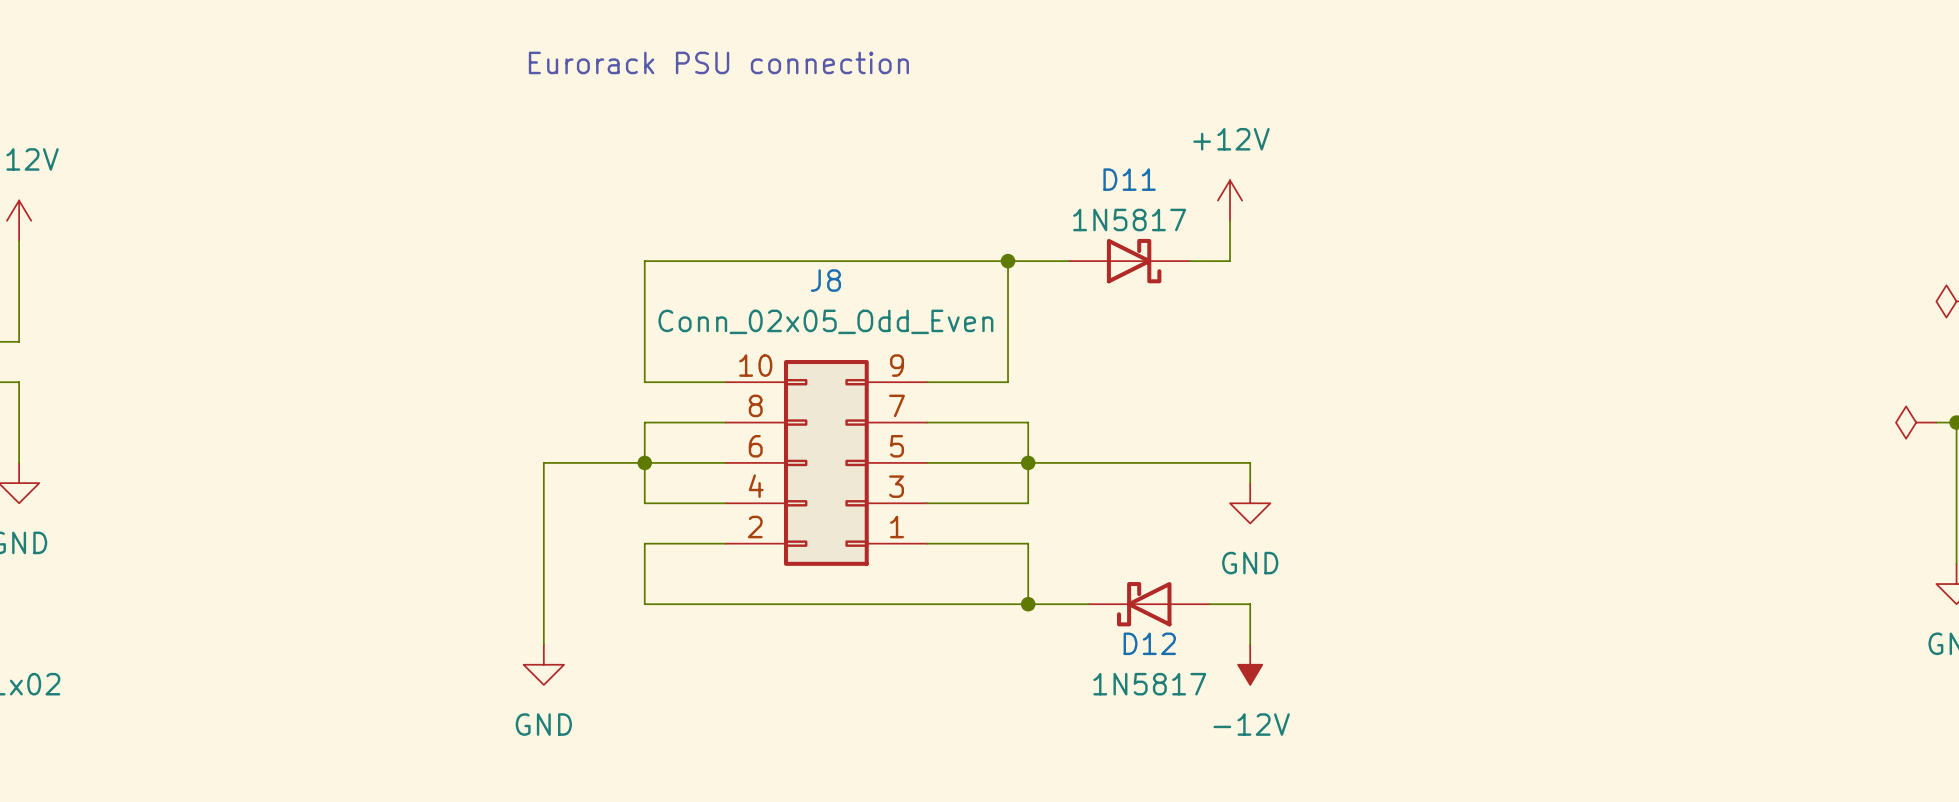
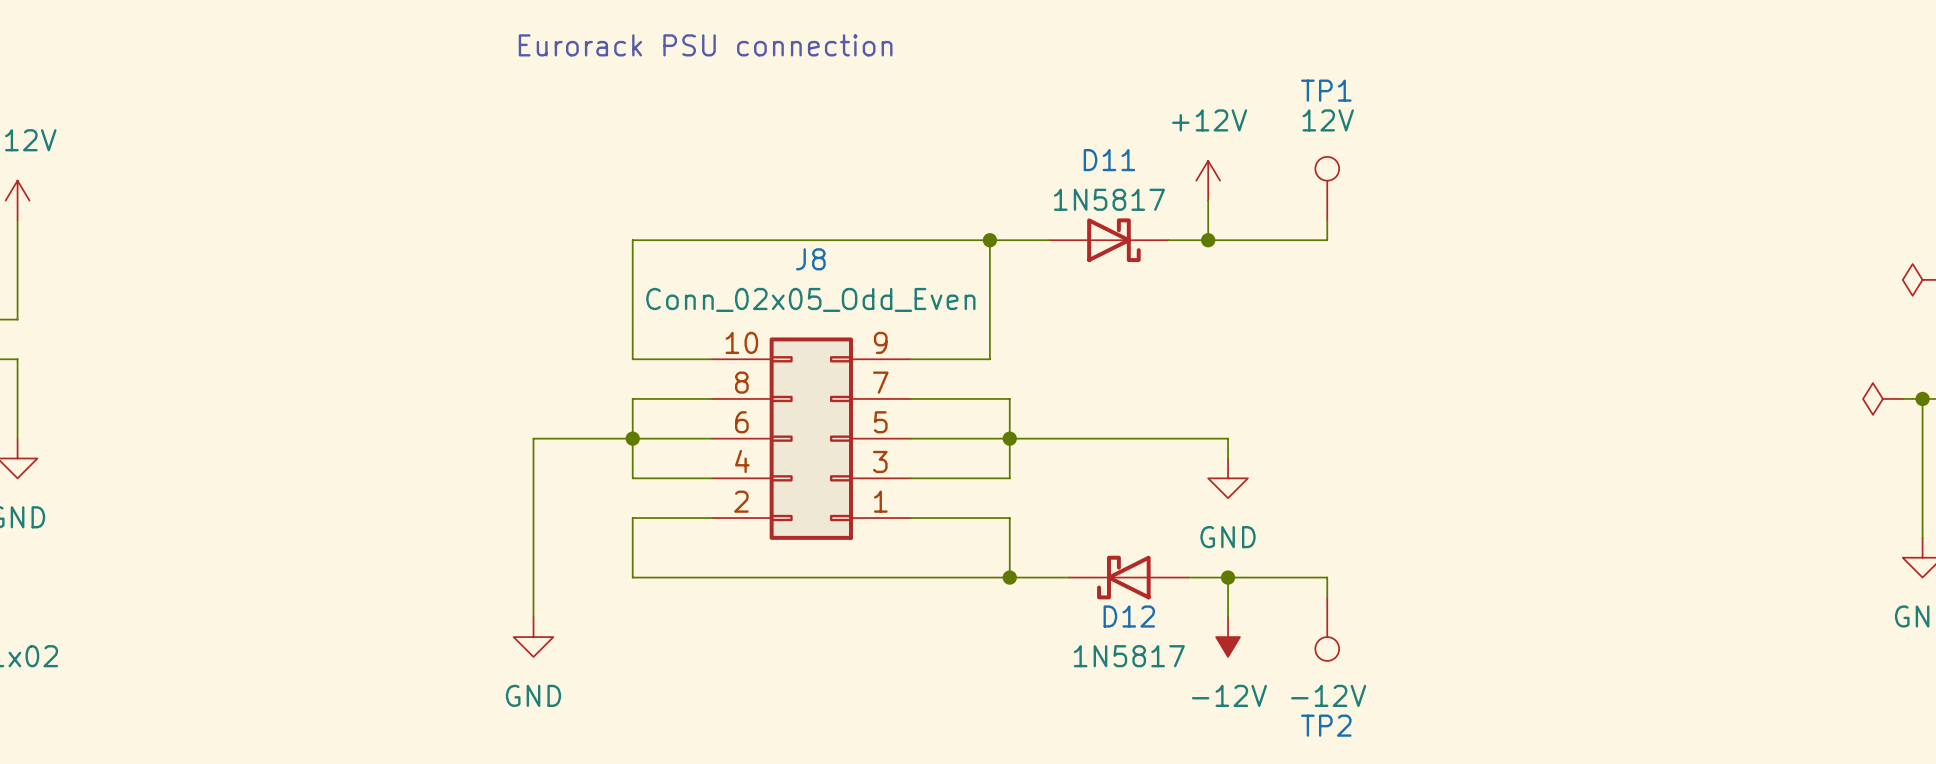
TP1: none -> 12V (1327, 188)
wire: none -> (1327, 220) (1327, 240) (1208, 240)
junction: none -> (1208, 240)
wire: none -> (1228, 577) (1327, 577) (1327, 597)
junction: none -> (1228, 577)
TP2: none -> -12V (1327, 629)

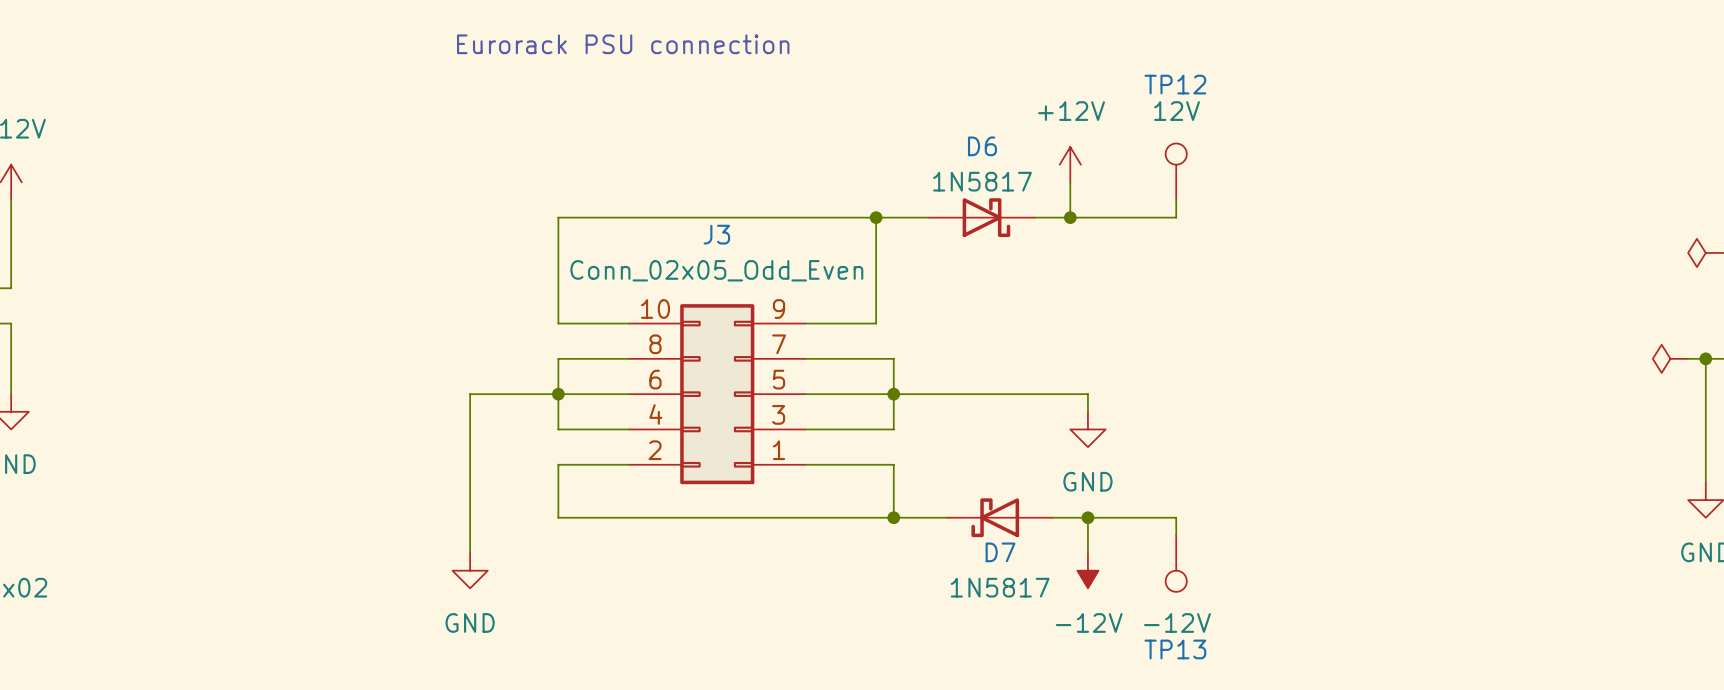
TP1 name: TP1 (1326, 90) -> TP12 (1175, 84)
D11 name: D11 (1109, 160) -> D6 (982, 146)
J8 name: J8 (810, 259) -> J3 (716, 234)
D12 name: D12 (1129, 616) -> D7 (1000, 552)
TP2 name: TP2 (1326, 725) -> TP13 (1175, 649)

